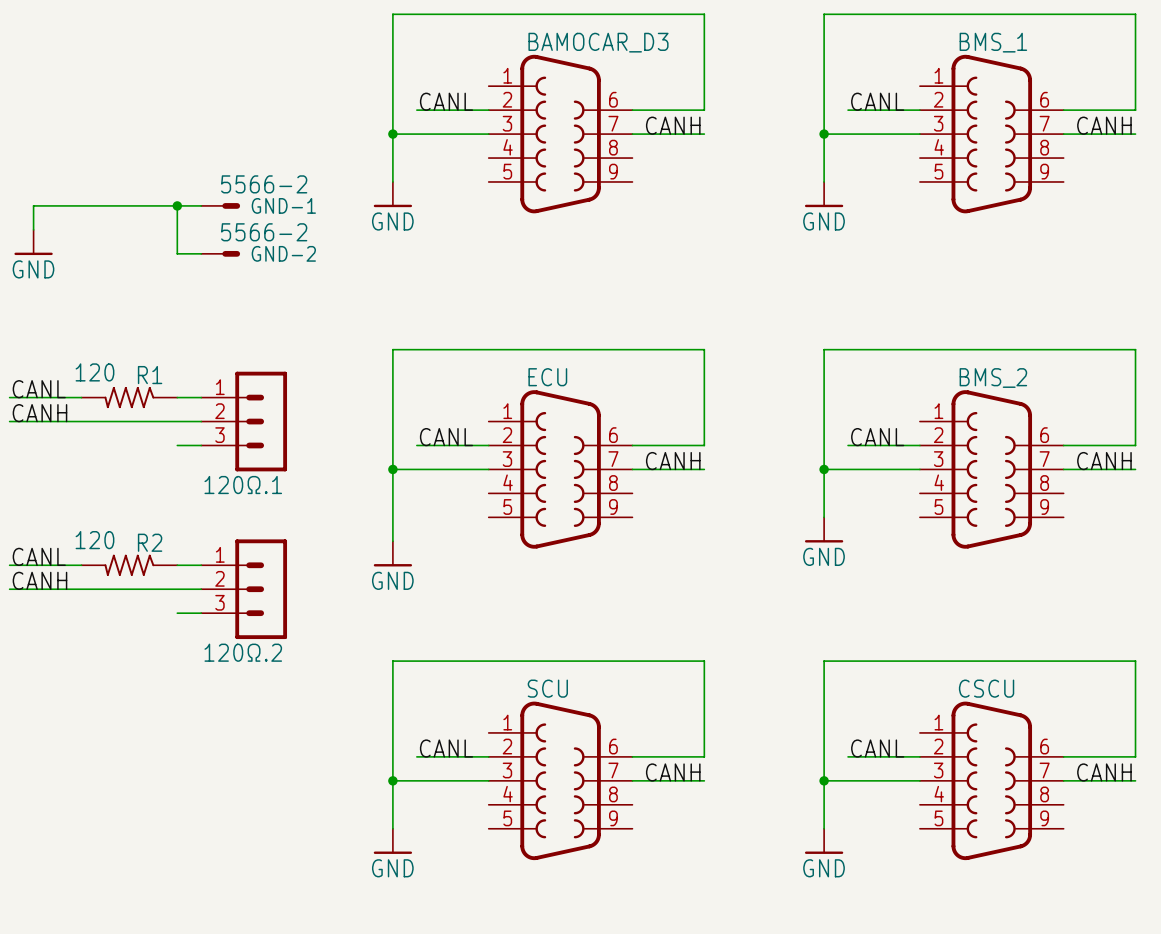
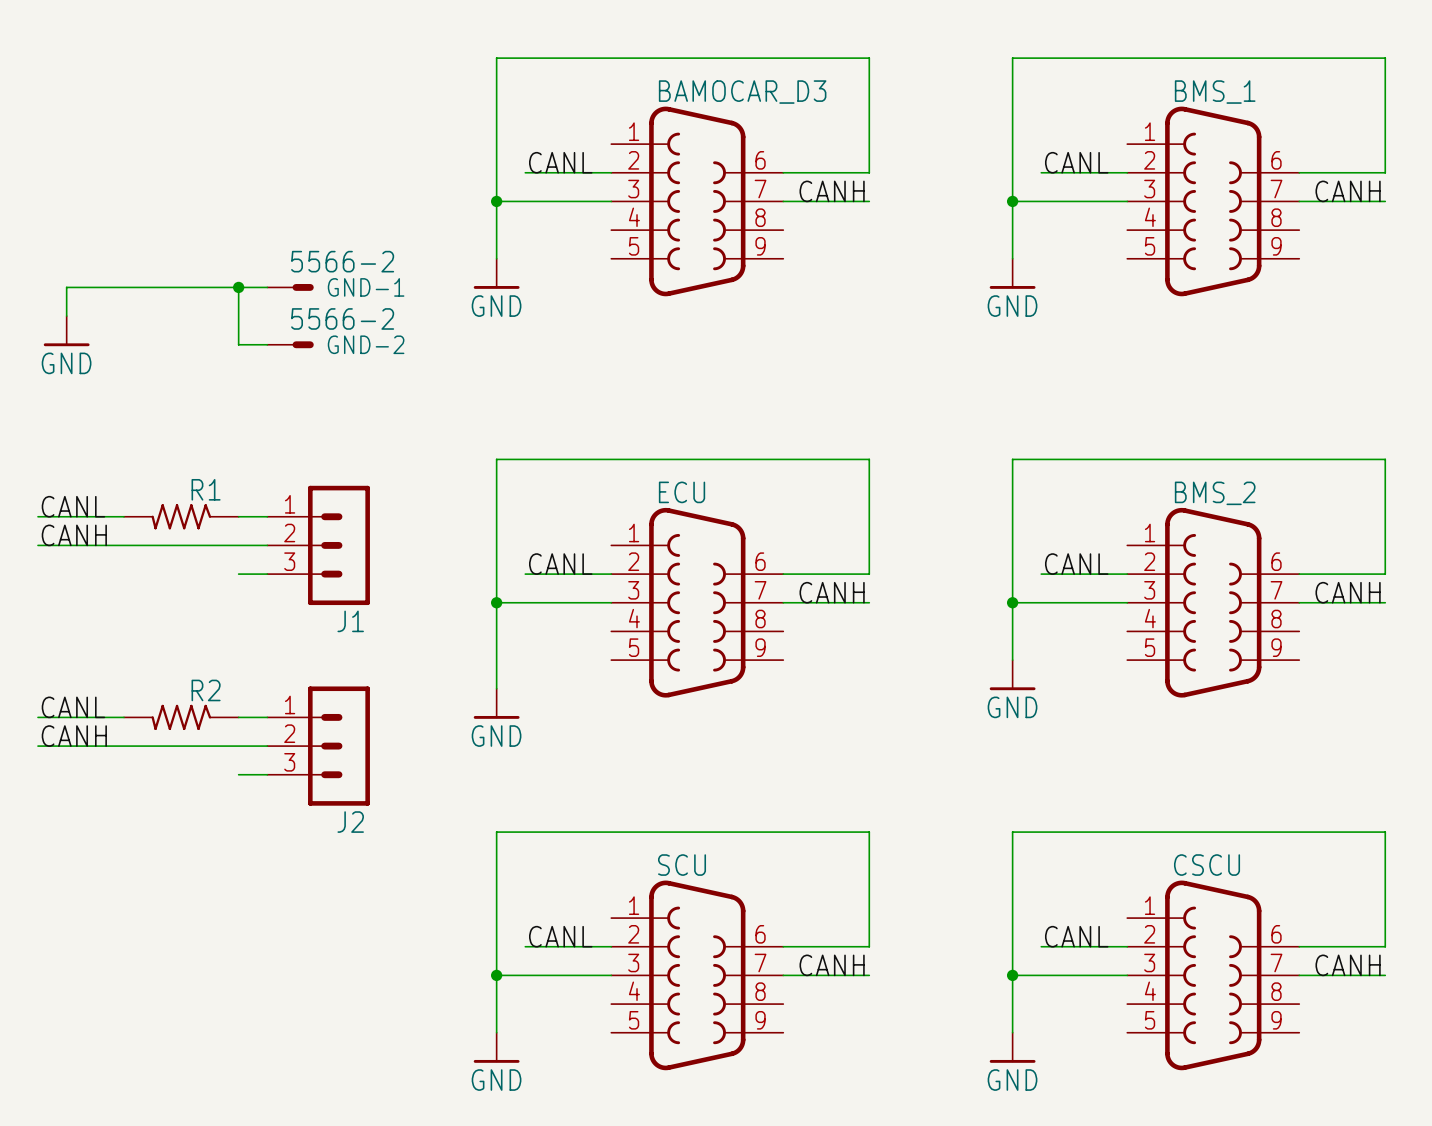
R1 value: 120 (94, 372) -> none
120Ω.1 name: 120Ω.1 (243, 485) -> J1 (350, 621)
R2 value: 120 (94, 540) -> none
120Ω.2 name: 120Ω.2 (243, 652) -> J2 (350, 822)

